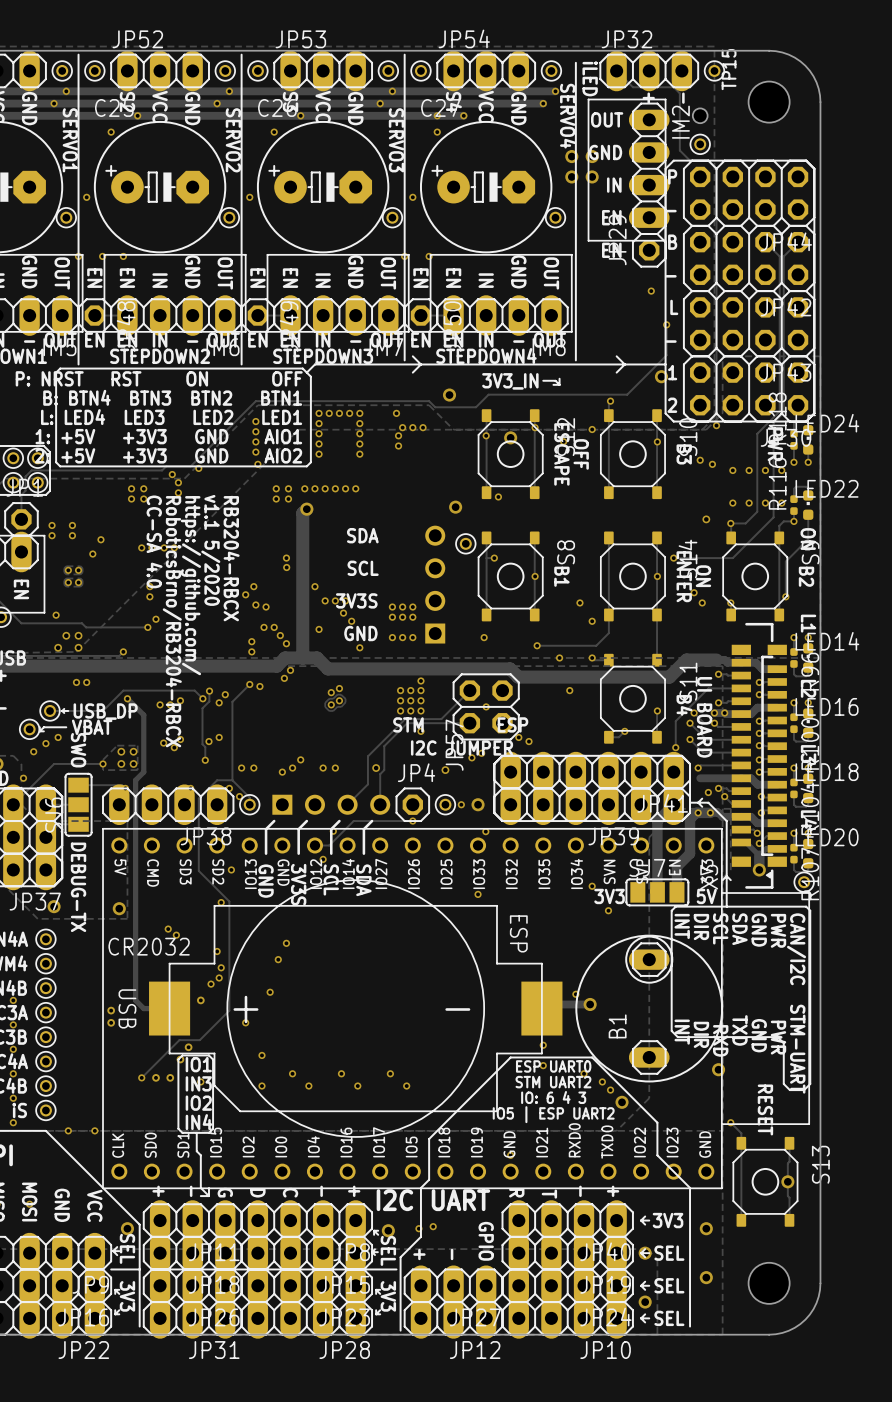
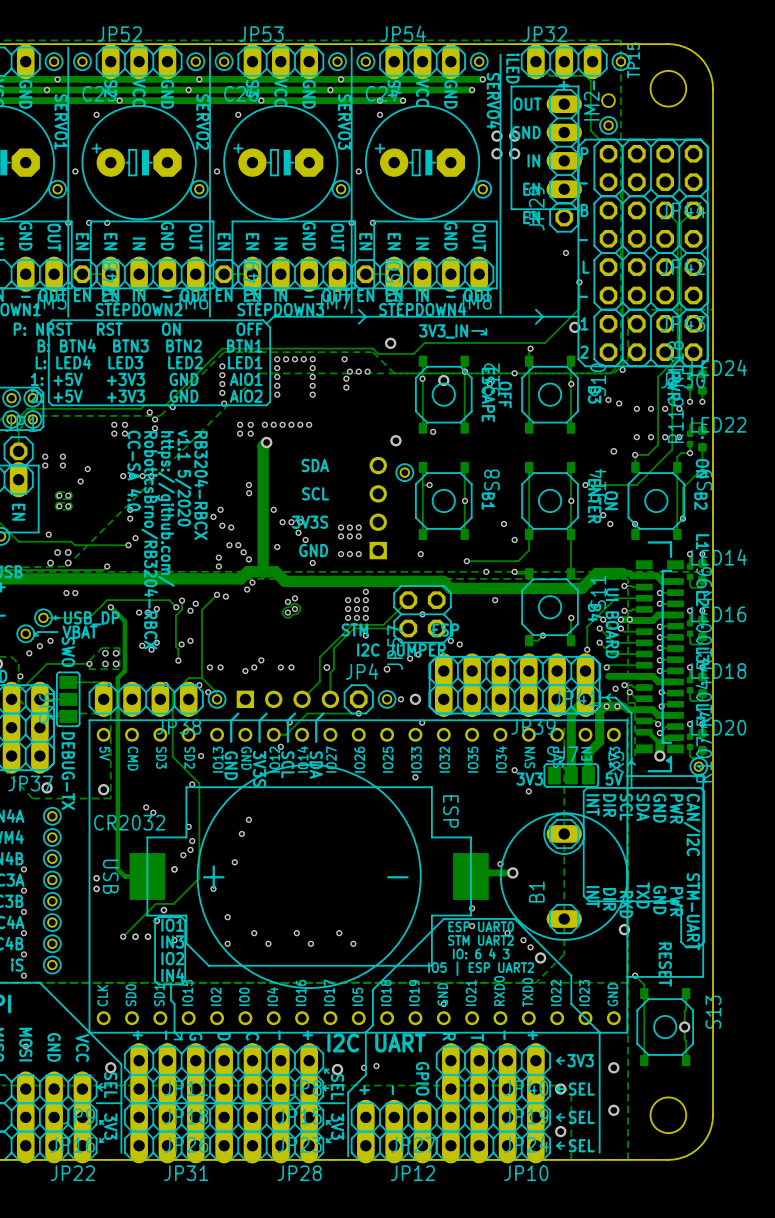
part: (45, 939) -> none
part: none -> (52, 816)
part: (45, 963) -> none
part: none -> (52, 837)
part: (45, 988) -> none
part: none -> (52, 858)
via: (13, 1000) -> none
via: none -> (23, 869)
part: (45, 1012) -> none
part: none -> (52, 880)
via: (13, 1024) -> none
via: none -> (23, 890)
part: (45, 1037) -> none
part: none -> (52, 901)
via: (13, 1049) -> none
via: none -> (23, 911)
part: (45, 1061) -> none
part: none -> (52, 922)
via: (13, 1073) -> none
via: none -> (23, 933)
part: (45, 1086) -> none
part: none -> (52, 943)
via: (13, 1098) -> none
via: none -> (23, 954)
part: (45, 1110) -> none
part: none -> (52, 965)
via: (13, 1122) -> none
via: none -> (23, 975)
via: (68, 1130) -> none
via: (94, 1130) -> none

